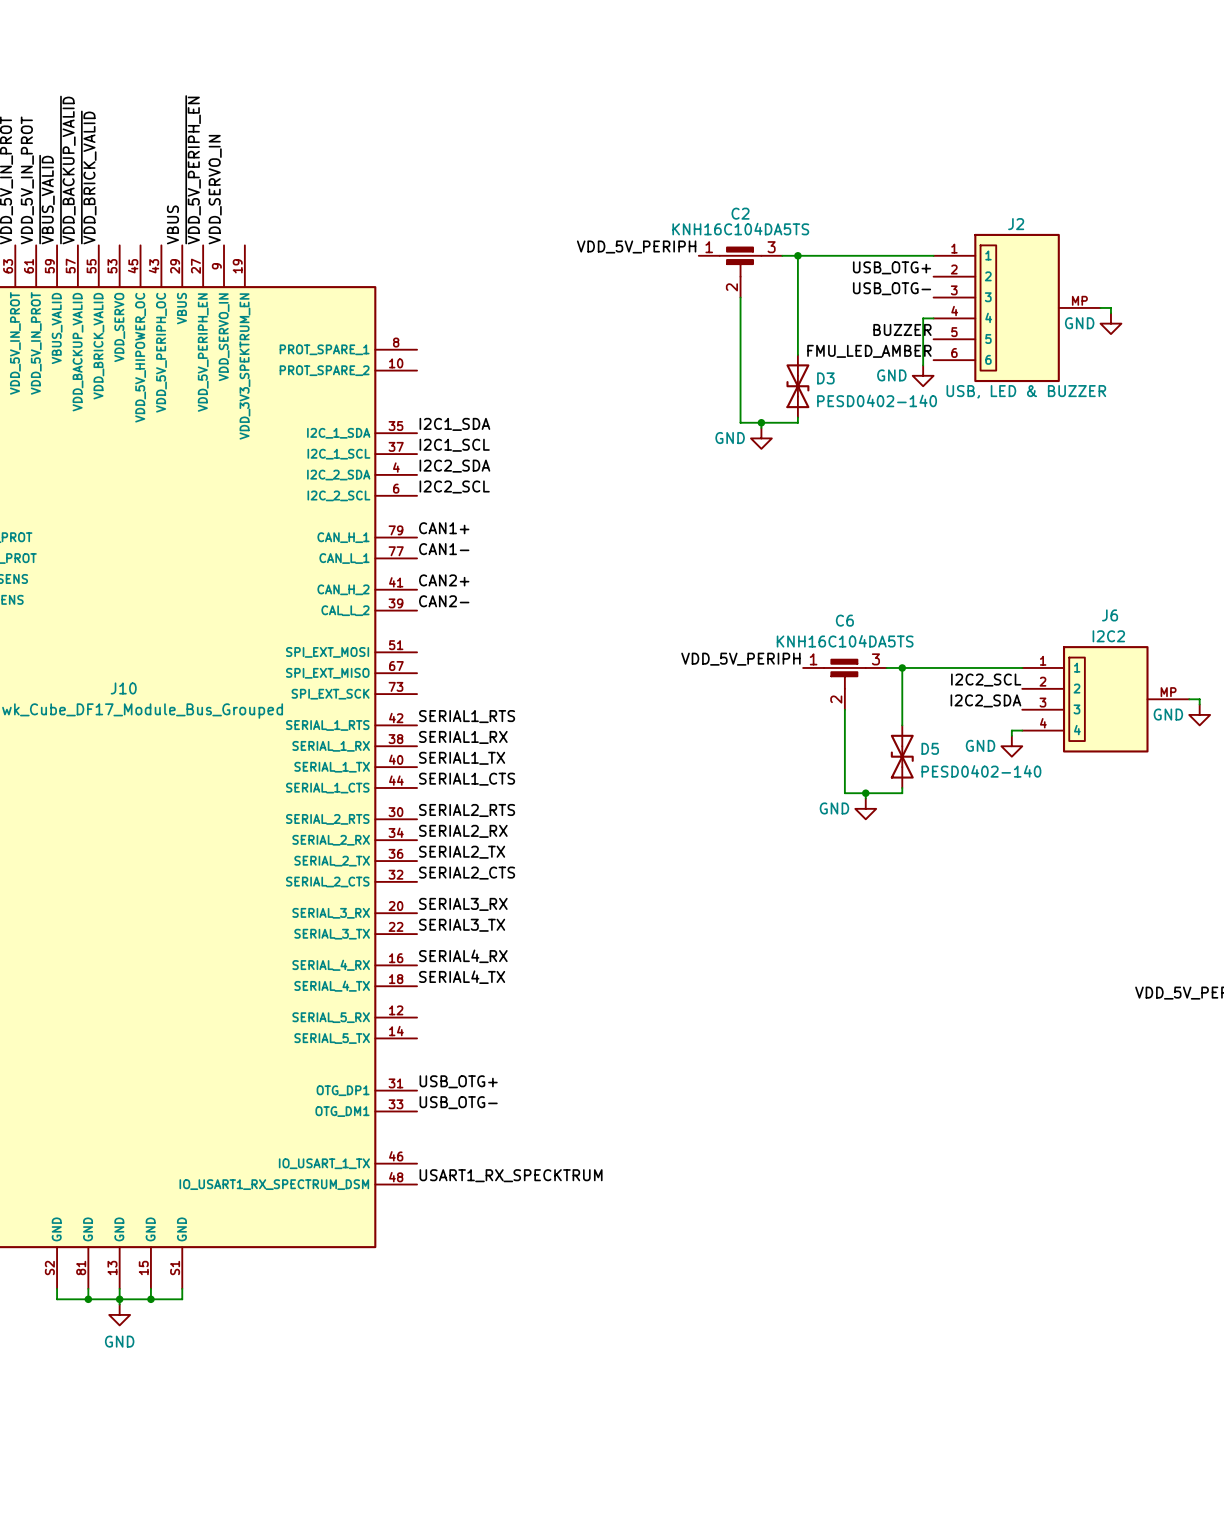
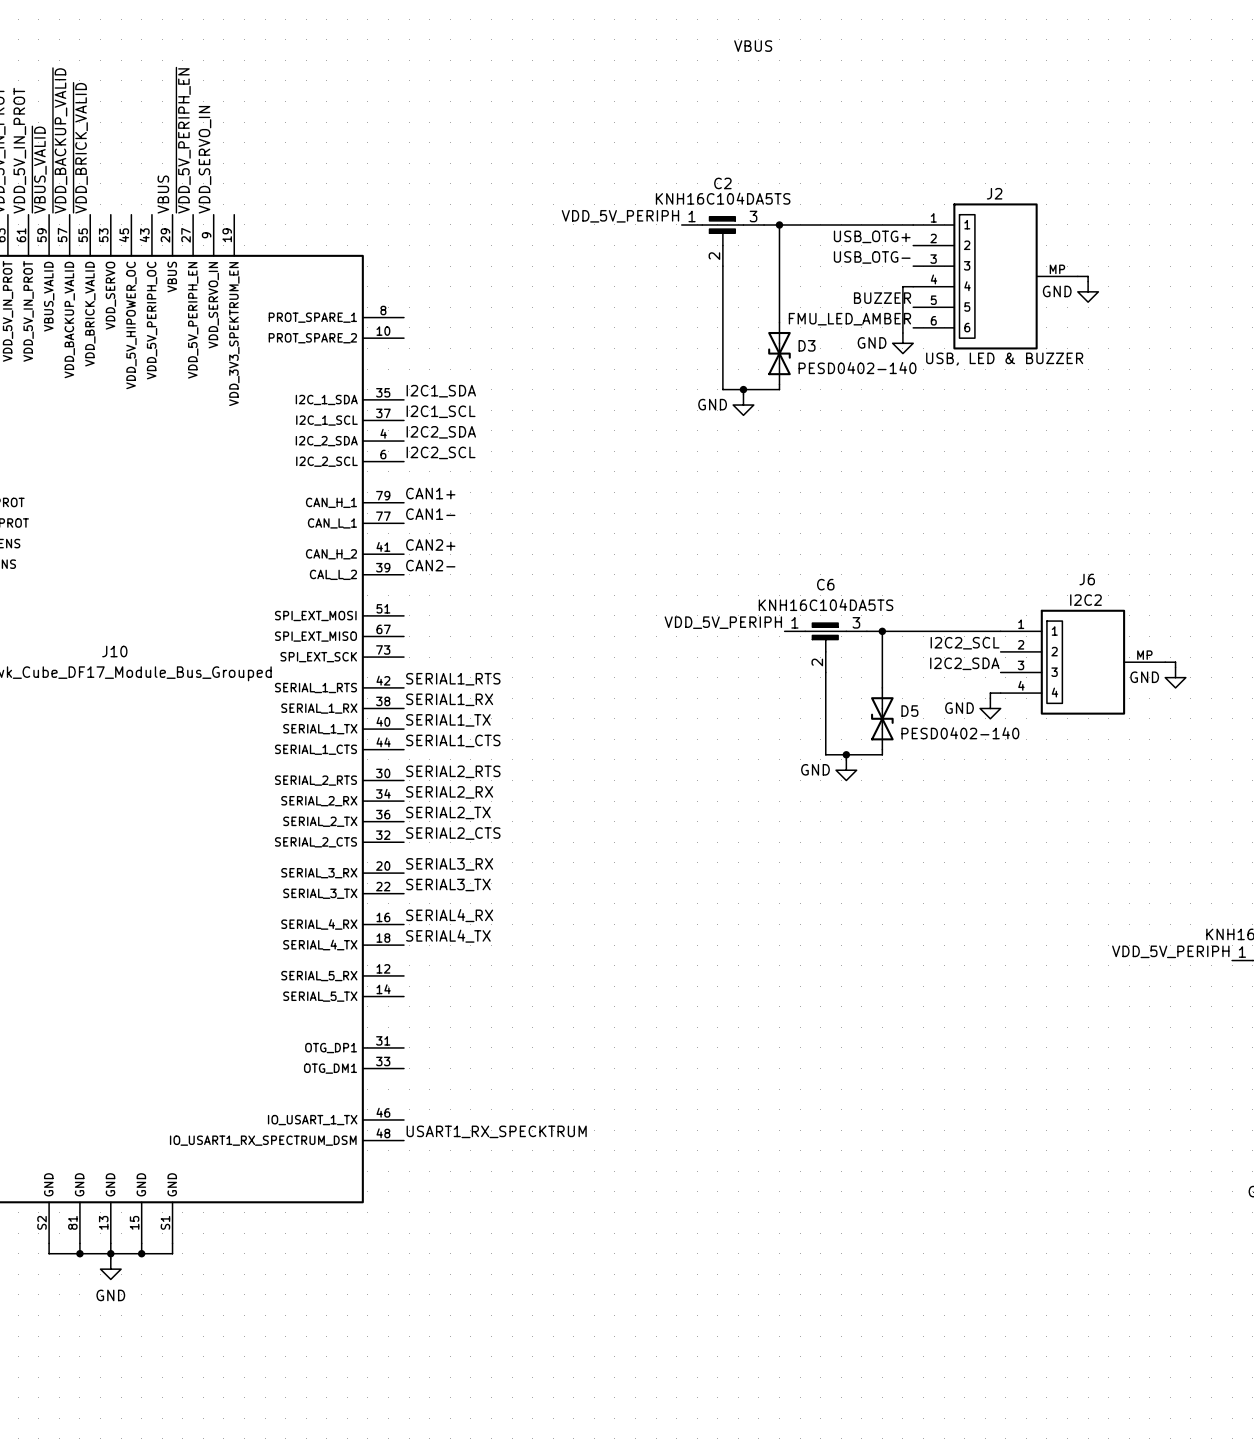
label: none -> VBUS (753, 46)
label: USB_OTG+ (458, 1081) -> none
label: USB_OTG- (458, 1102) -> none

